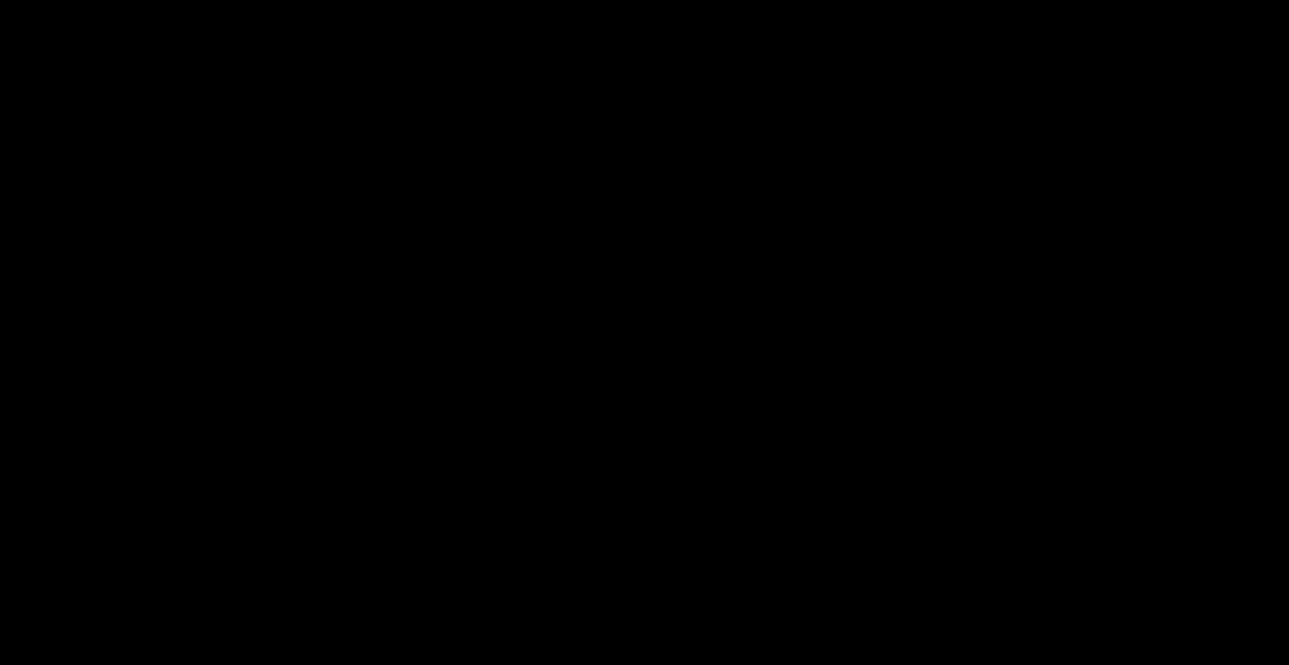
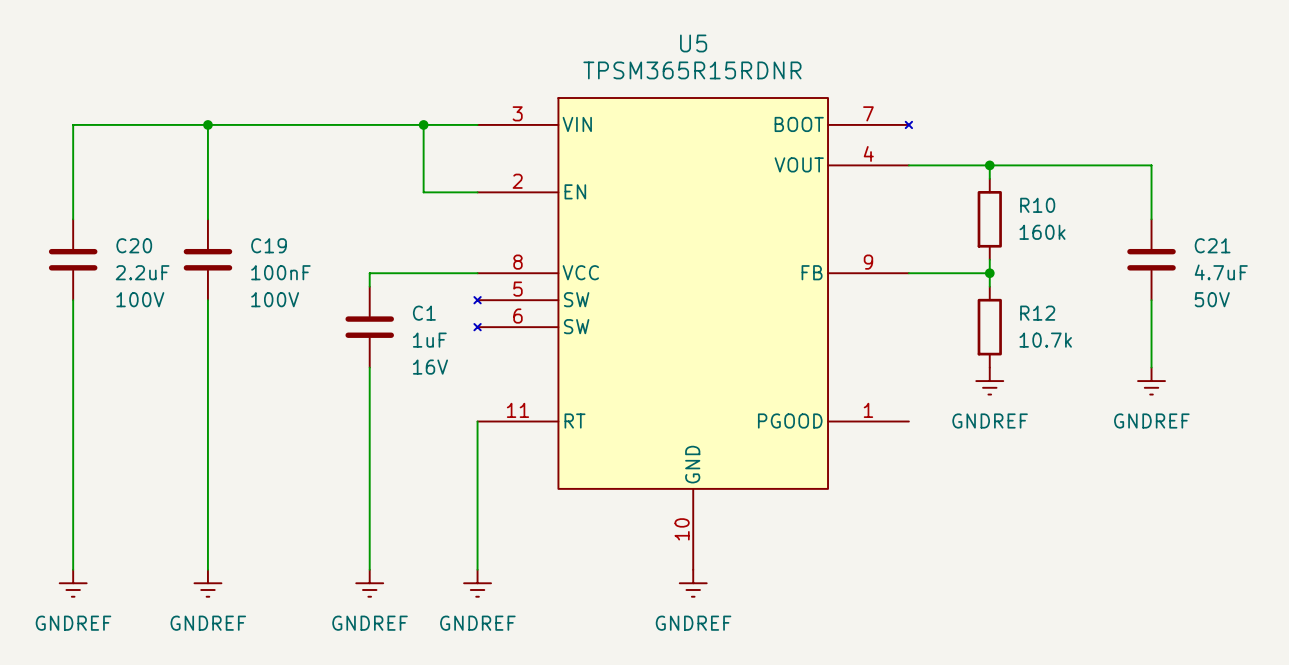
wire: none -> (207, 124) (207, 219)
junction: none -> (207, 124)
wire: none -> (423, 124) (423, 192) (477, 192)
junction: none -> (423, 124)
wire: none -> (477, 124) (73, 124) (73, 219)
wire: none -> (908, 165) (1151, 165) (1151, 219)
wire: none -> (989, 165) (989, 178)
junction: none -> (989, 165)
R10: none -> 160k (989, 219)
C20: none -> 2.2uF (73, 259)
C19: none -> 100nF (207, 259)
wire: none -> (989, 259) (989, 286)
C21: none -> 4.7uF (1151, 259)
wire: none -> (477, 273) (369, 273) (369, 286)
wire: none -> (908, 273) (989, 273)
junction: none -> (989, 273)
wire: none -> (73, 300) (73, 569)
wire: none -> (207, 300) (207, 569)
wire: none -> (1151, 300) (1151, 367)
C1: none -> 1uF (369, 327)
R12: none -> 10.7k (989, 327)
U5: none -> TPSM365R15RDNR (693, 333)
wire: none -> (369, 367) (369, 569)
power symbol: none -> GNDREF (989, 381)
power symbol: none -> GNDREF (1151, 381)
wire: none -> (477, 421) (477, 569)
power symbol: none -> GNDREF (73, 583)
power symbol: none -> GNDREF (207, 583)
power symbol: none -> GNDREF (369, 583)
power symbol: none -> GNDREF (477, 583)
power symbol: none -> GNDREF (693, 583)

